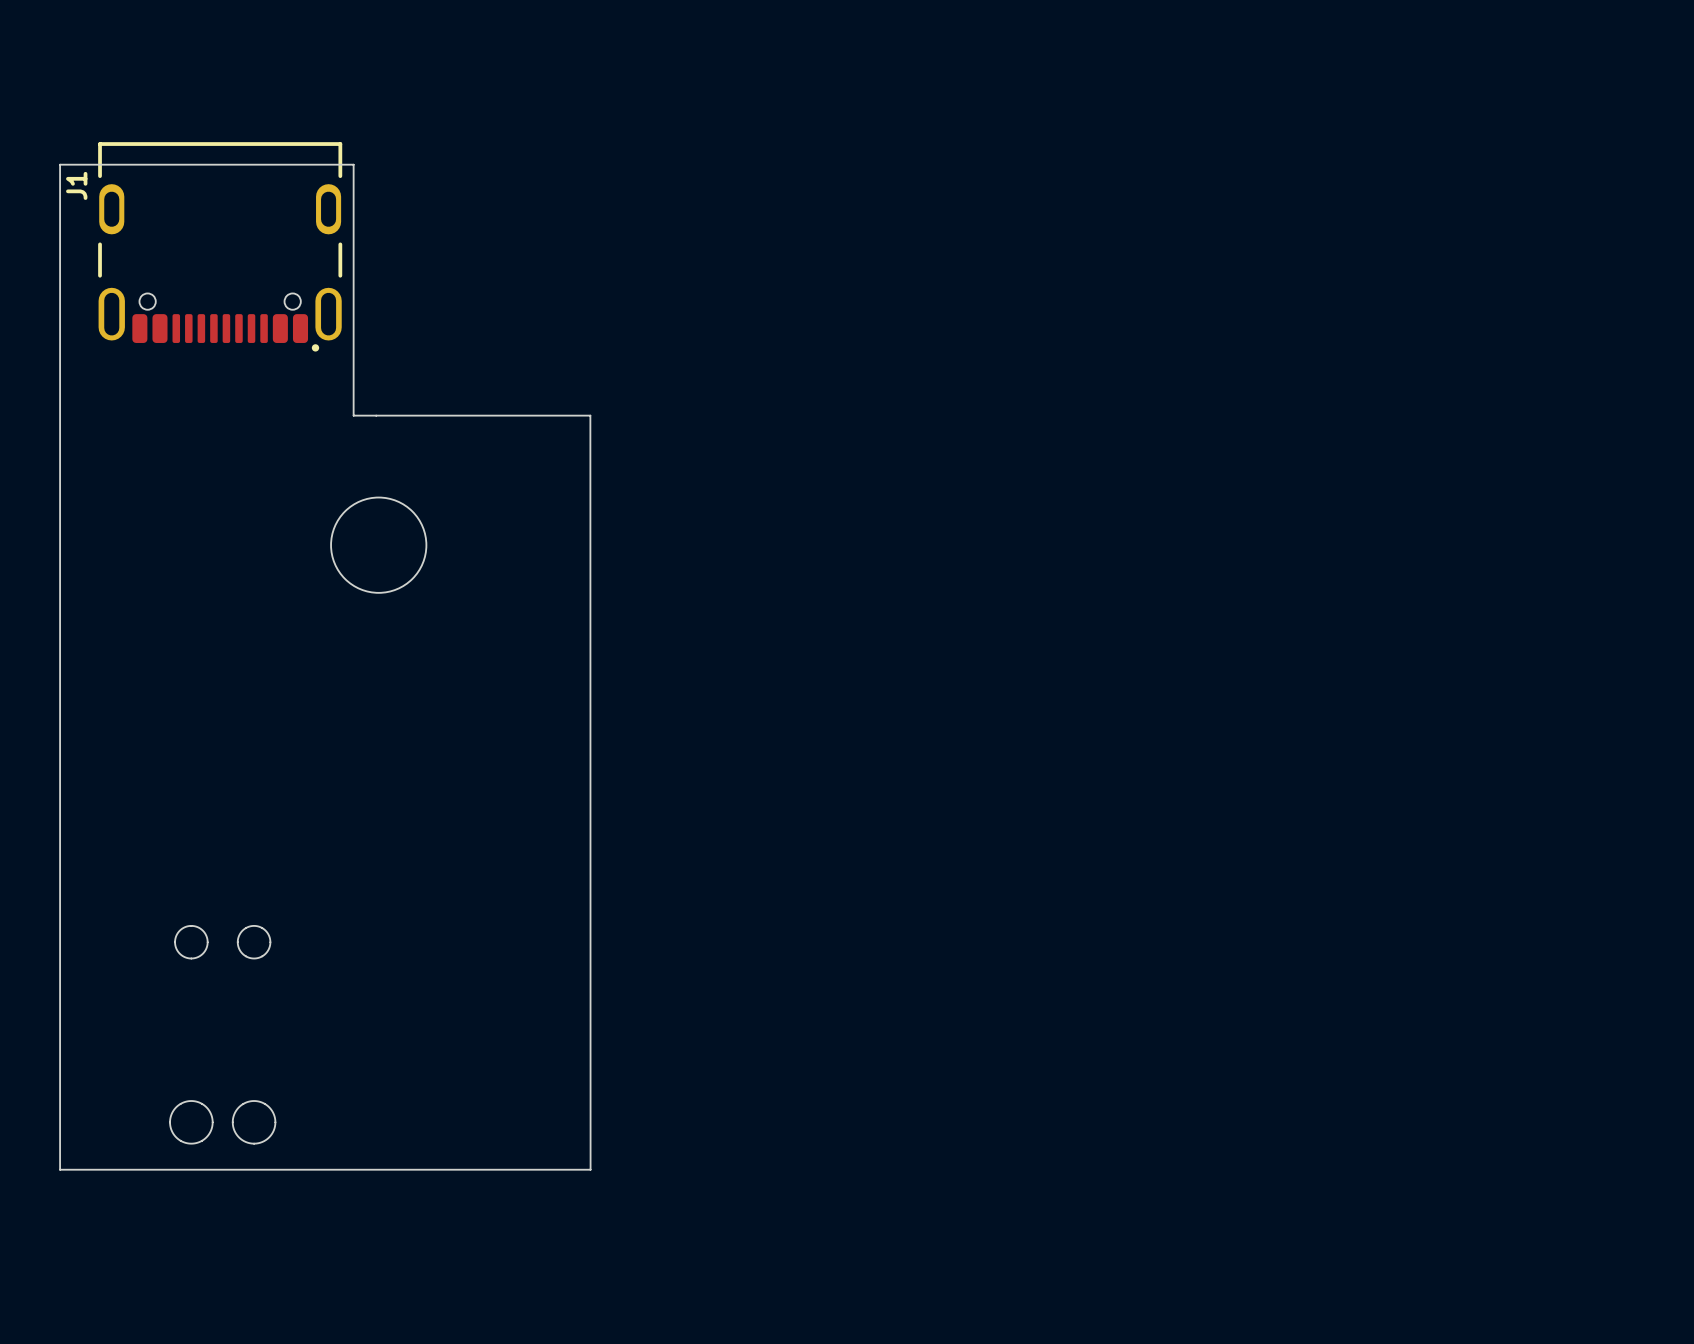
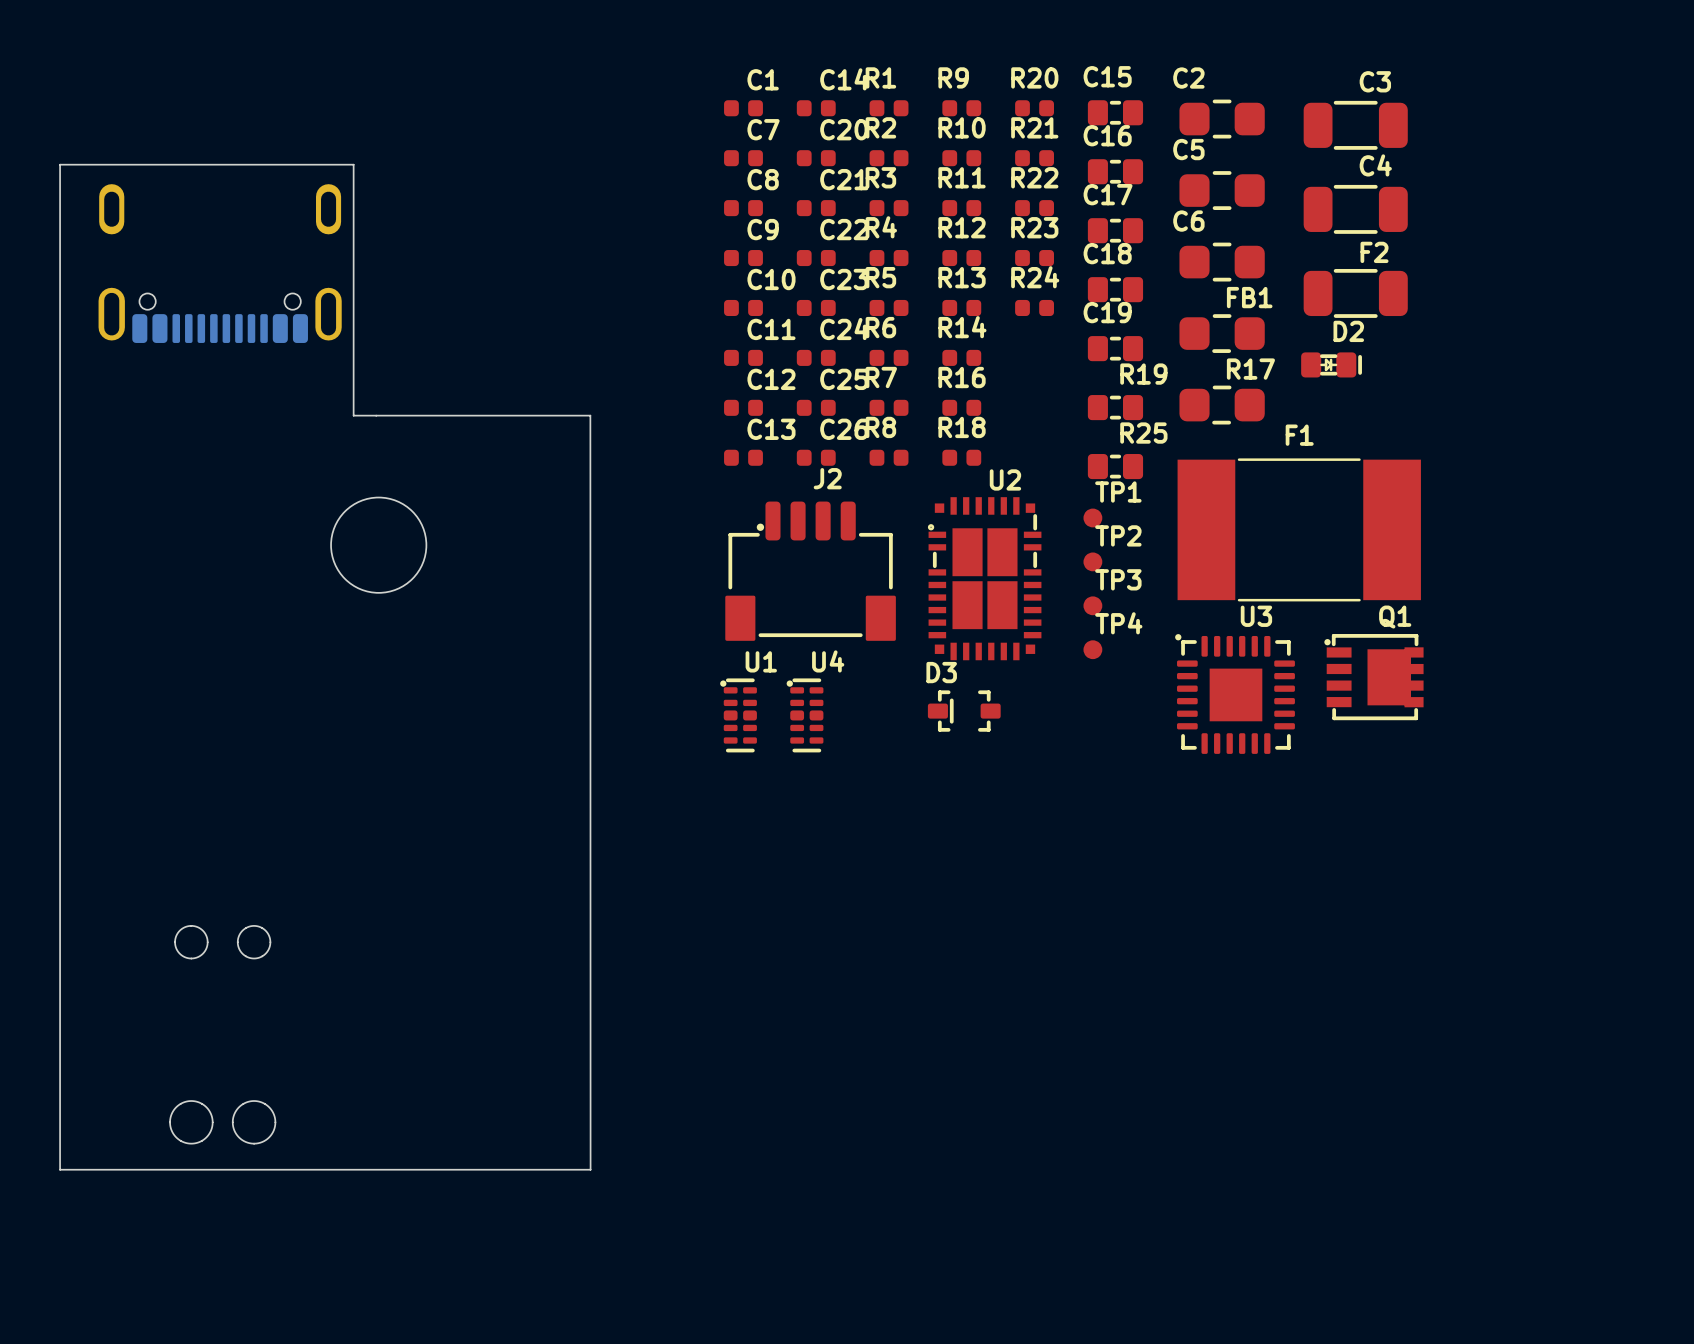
C1: none -> (743, 108)
C14: none -> (816, 108)
R1: none -> (889, 108)
R9: none -> (961, 108)
R20: none -> (1034, 108)
C15: none -> (1115, 112)
C2: none -> (1222, 119)
C3: none -> (1355, 125)
C7: none -> (743, 158)
C20: none -> (816, 158)
R2: none -> (889, 158)
R10: none -> (961, 158)
R21: none -> (1034, 158)
C16: none -> (1115, 171)
C5: none -> (1222, 190)
C8: none -> (743, 208)
C21: none -> (816, 208)
R3: none -> (889, 208)
R11: none -> (961, 208)
R22: none -> (1034, 208)
C4: none -> (1355, 209)
C17: none -> (1115, 230)
J1 side: top (220, 246) -> bottom (220, 263)
C9: none -> (743, 258)
C22: none -> (816, 258)
R4: none -> (889, 258)
R12: none -> (961, 258)
R23: none -> (1034, 258)
C6: none -> (1222, 262)
C18: none -> (1115, 289)
F2: none -> (1355, 293)
C10: none -> (743, 307)
C23: none -> (816, 307)
R5: none -> (889, 307)
R13: none -> (961, 307)
R24: none -> (1034, 307)
FB1: none -> (1222, 333)
C19: none -> (1115, 348)
C11: none -> (743, 357)
C24: none -> (816, 357)
R6: none -> (889, 357)
R14: none -> (961, 357)
D2: none -> (1331, 364)
R17: none -> (1222, 405)
C12: none -> (743, 407)
C25: none -> (816, 407)
R7: none -> (889, 407)
R16: none -> (961, 407)
R19: none -> (1115, 407)
C13: none -> (743, 457)
C26: none -> (816, 457)
R8: none -> (889, 457)
R18: none -> (961, 457)
R25: none -> (1115, 466)
TP1: none -> (1092, 517)
F1: none -> (1299, 529)
TP2: none -> (1092, 561)
J2: none -> (810, 571)
U2: none -> (984, 578)
TP3: none -> (1092, 605)
TP4: none -> (1092, 649)
Q1: none -> (1373, 677)
U3: none -> (1235, 694)
D3: none -> (964, 711)
U1: none -> (738, 715)
U4: none -> (805, 715)

